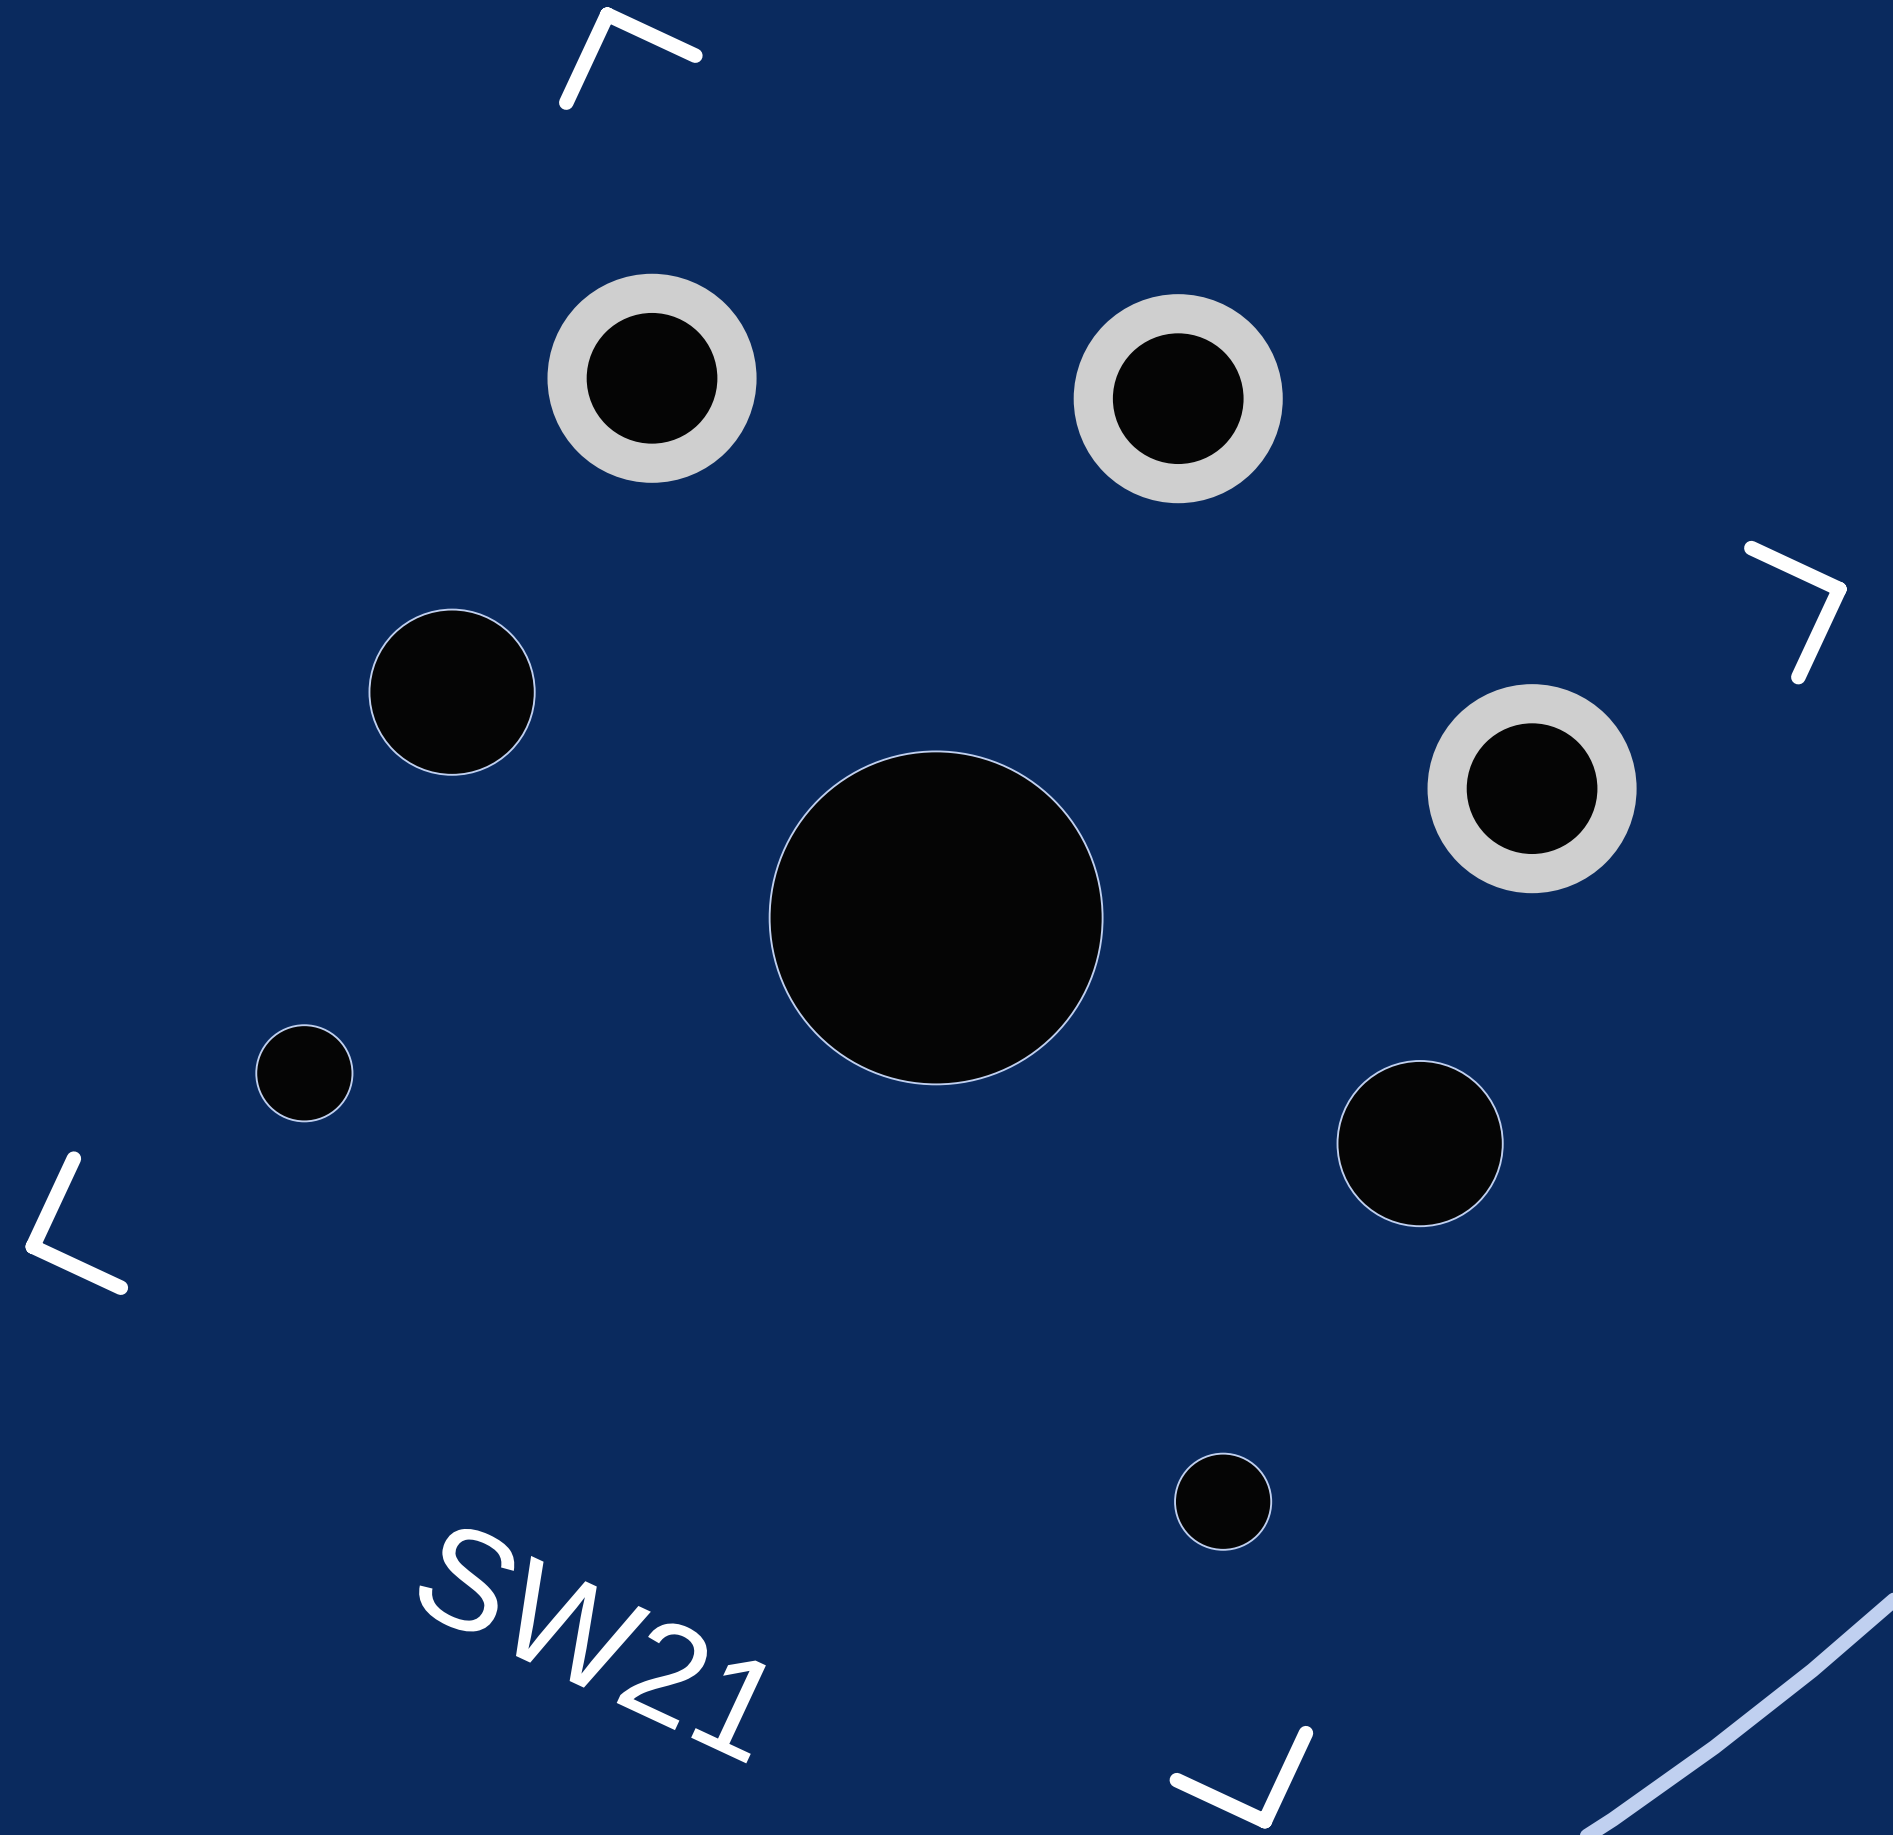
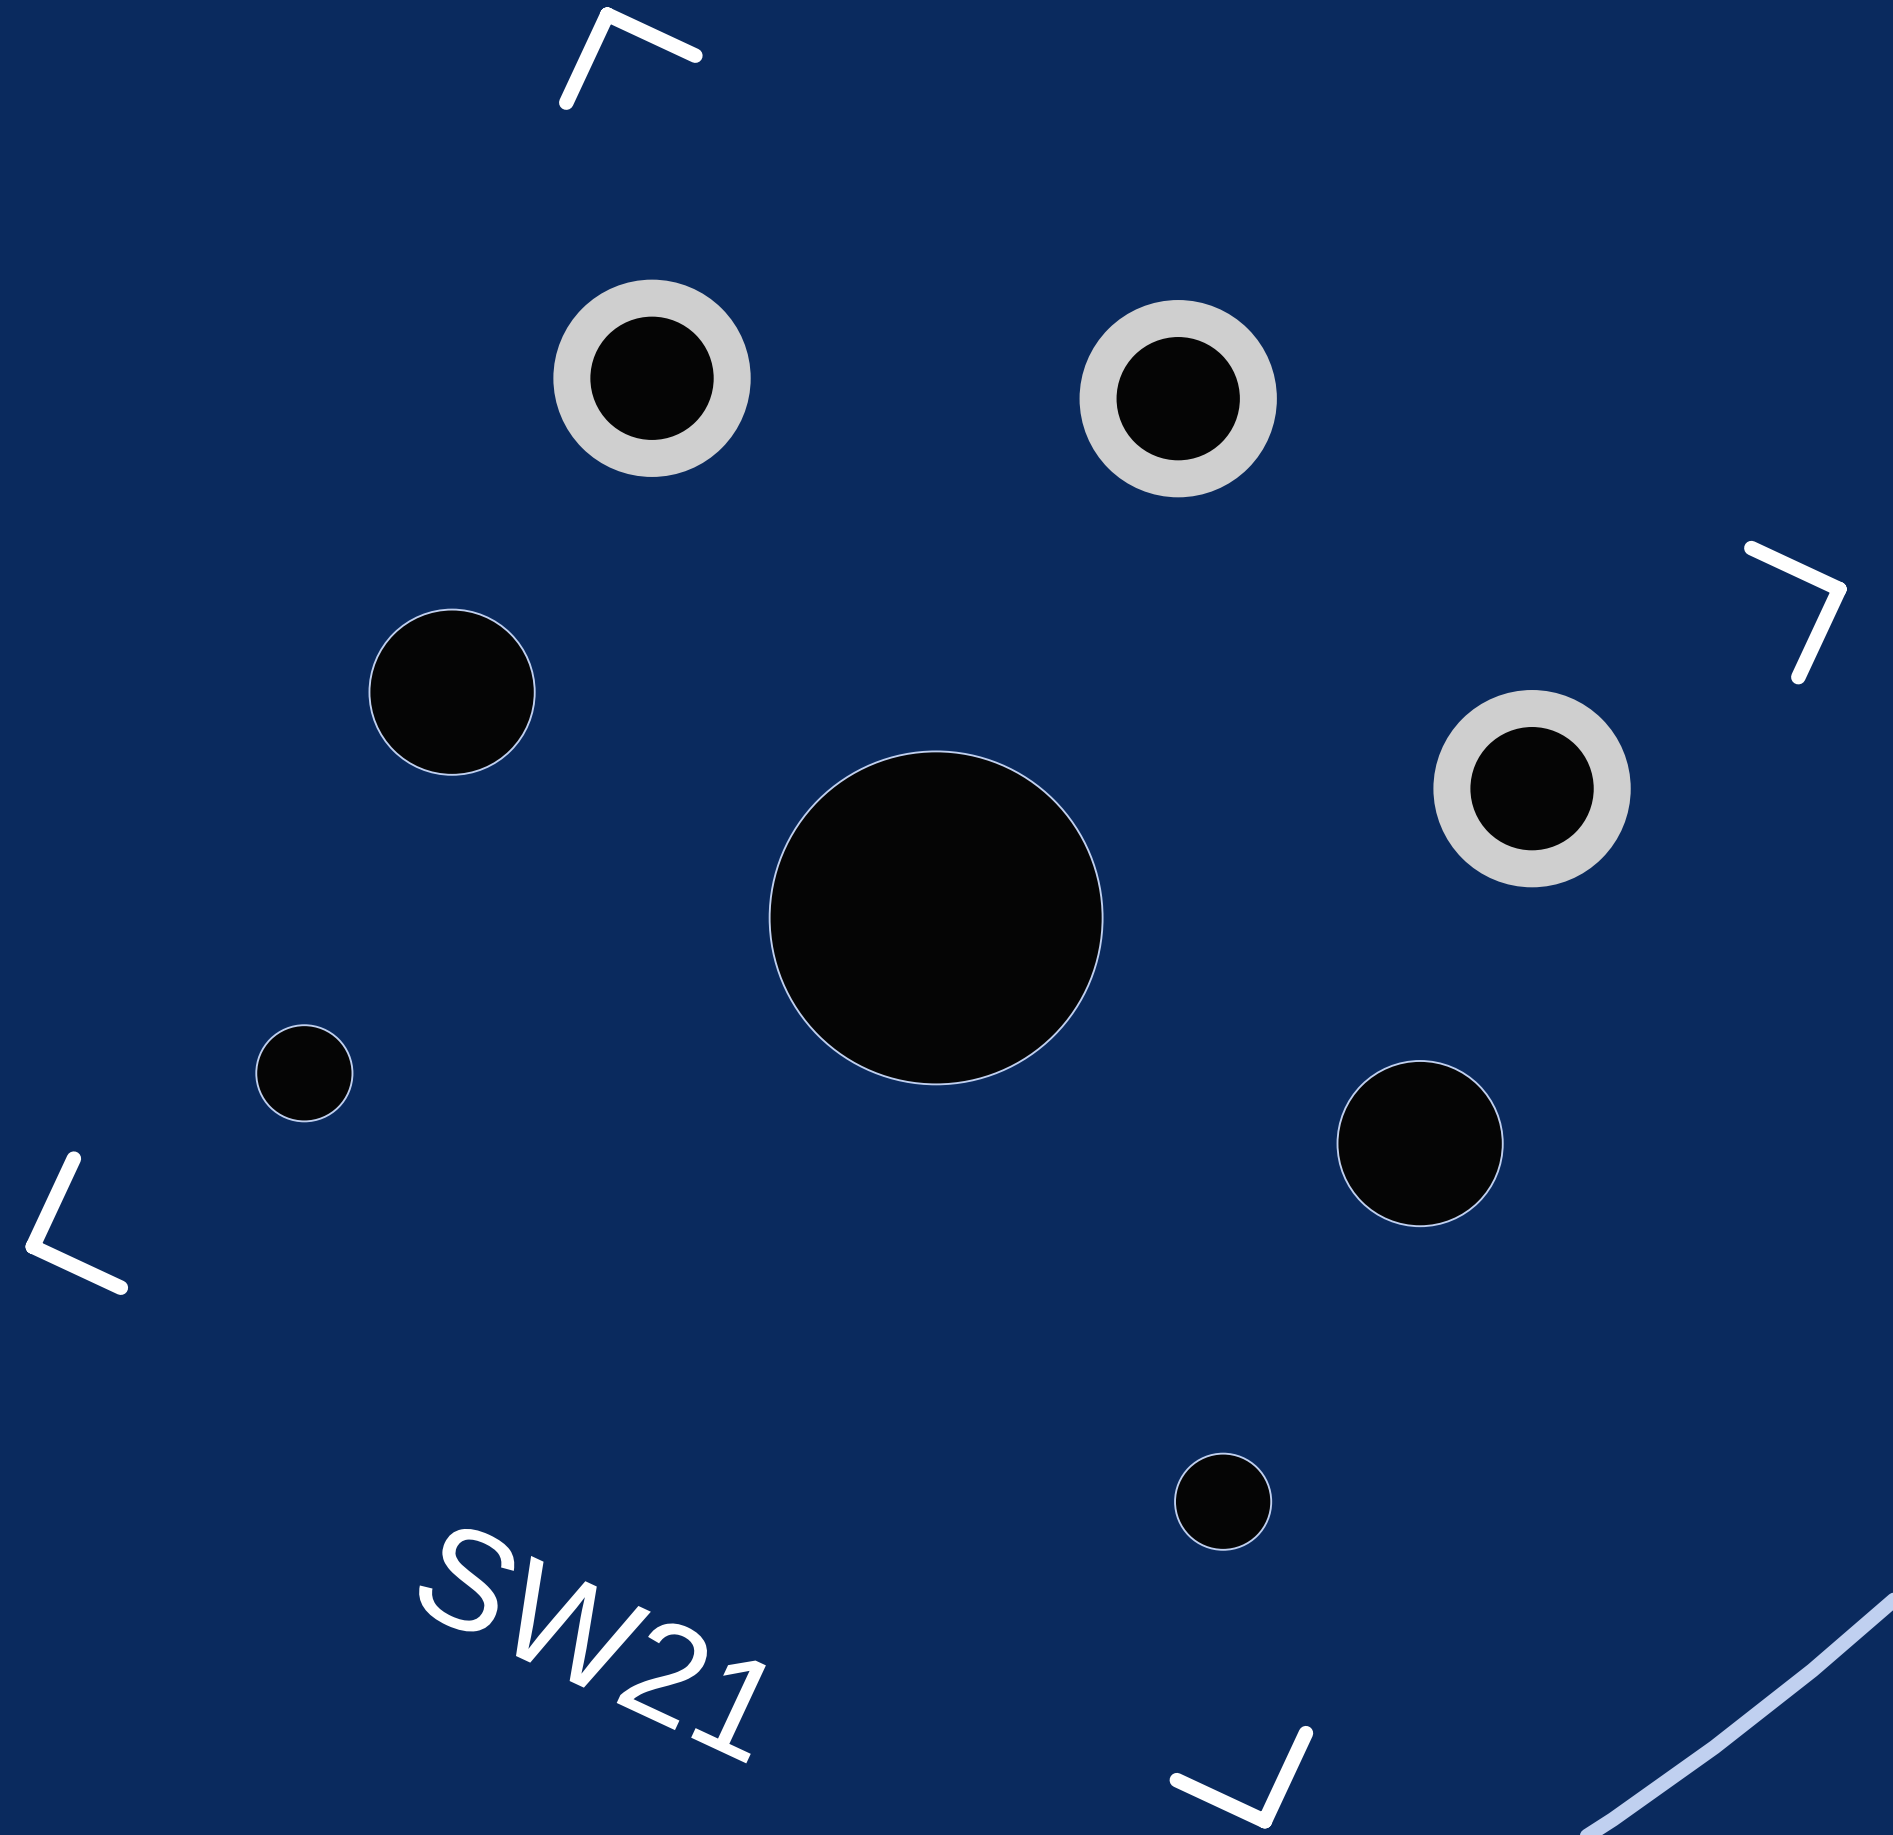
SW21 footprint: [25, 7, 1847, 1829] -> [25, 7, 1847, 1829]

